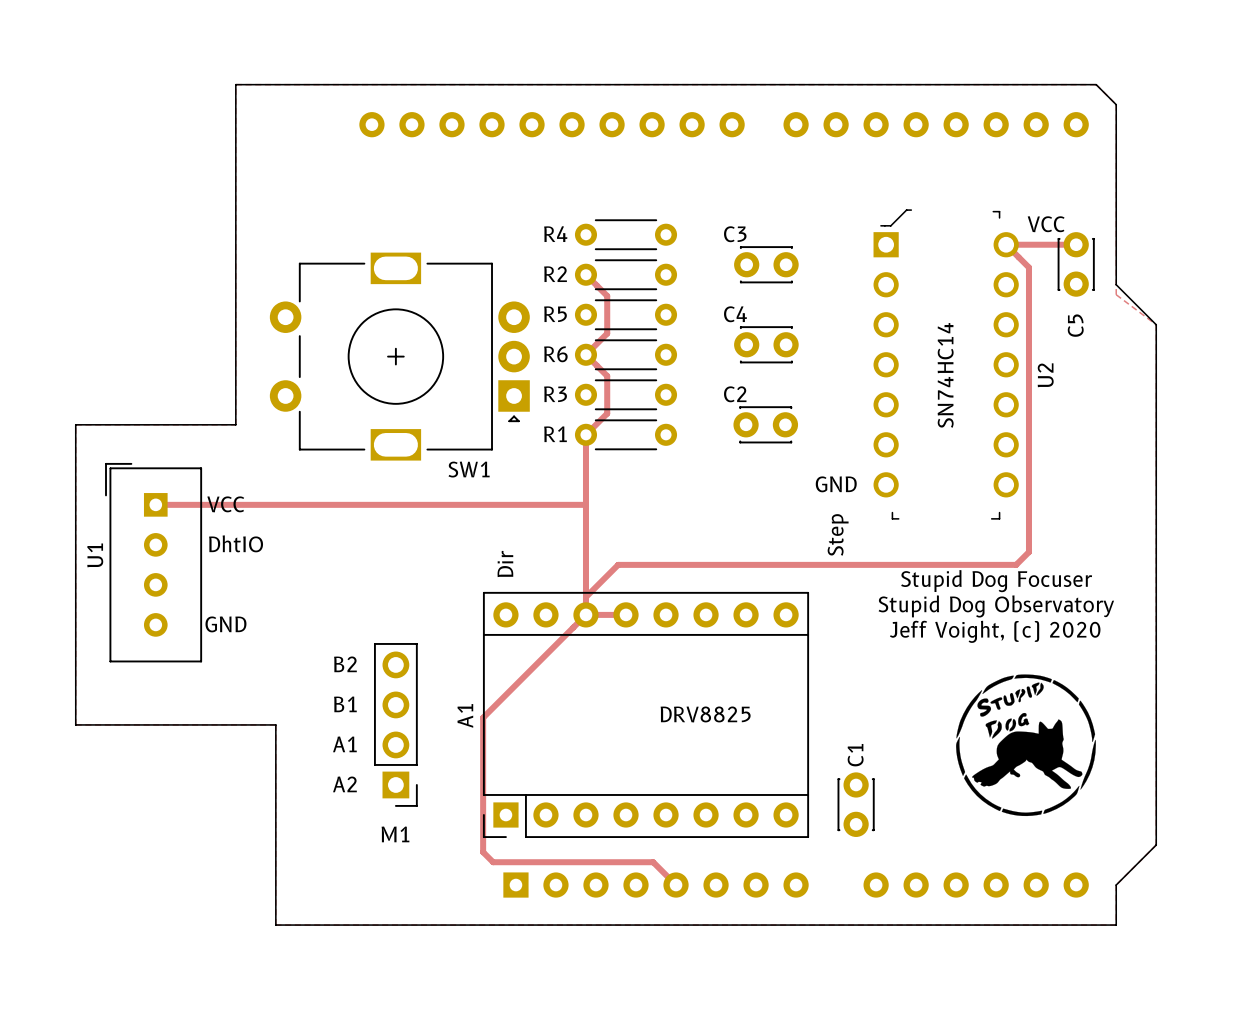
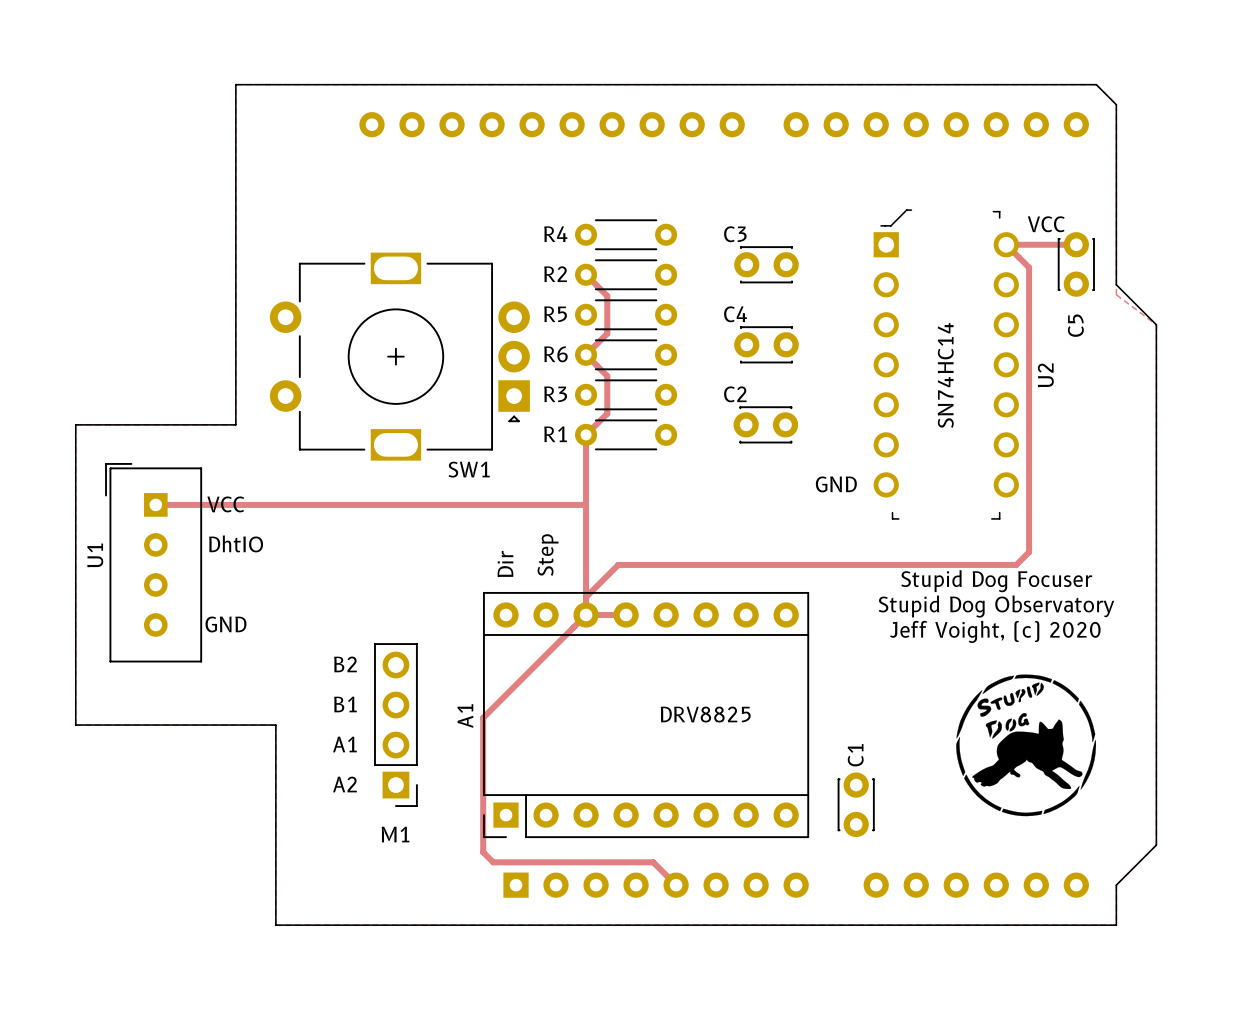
text position: Step (838, 534) -> Step (548, 555)

